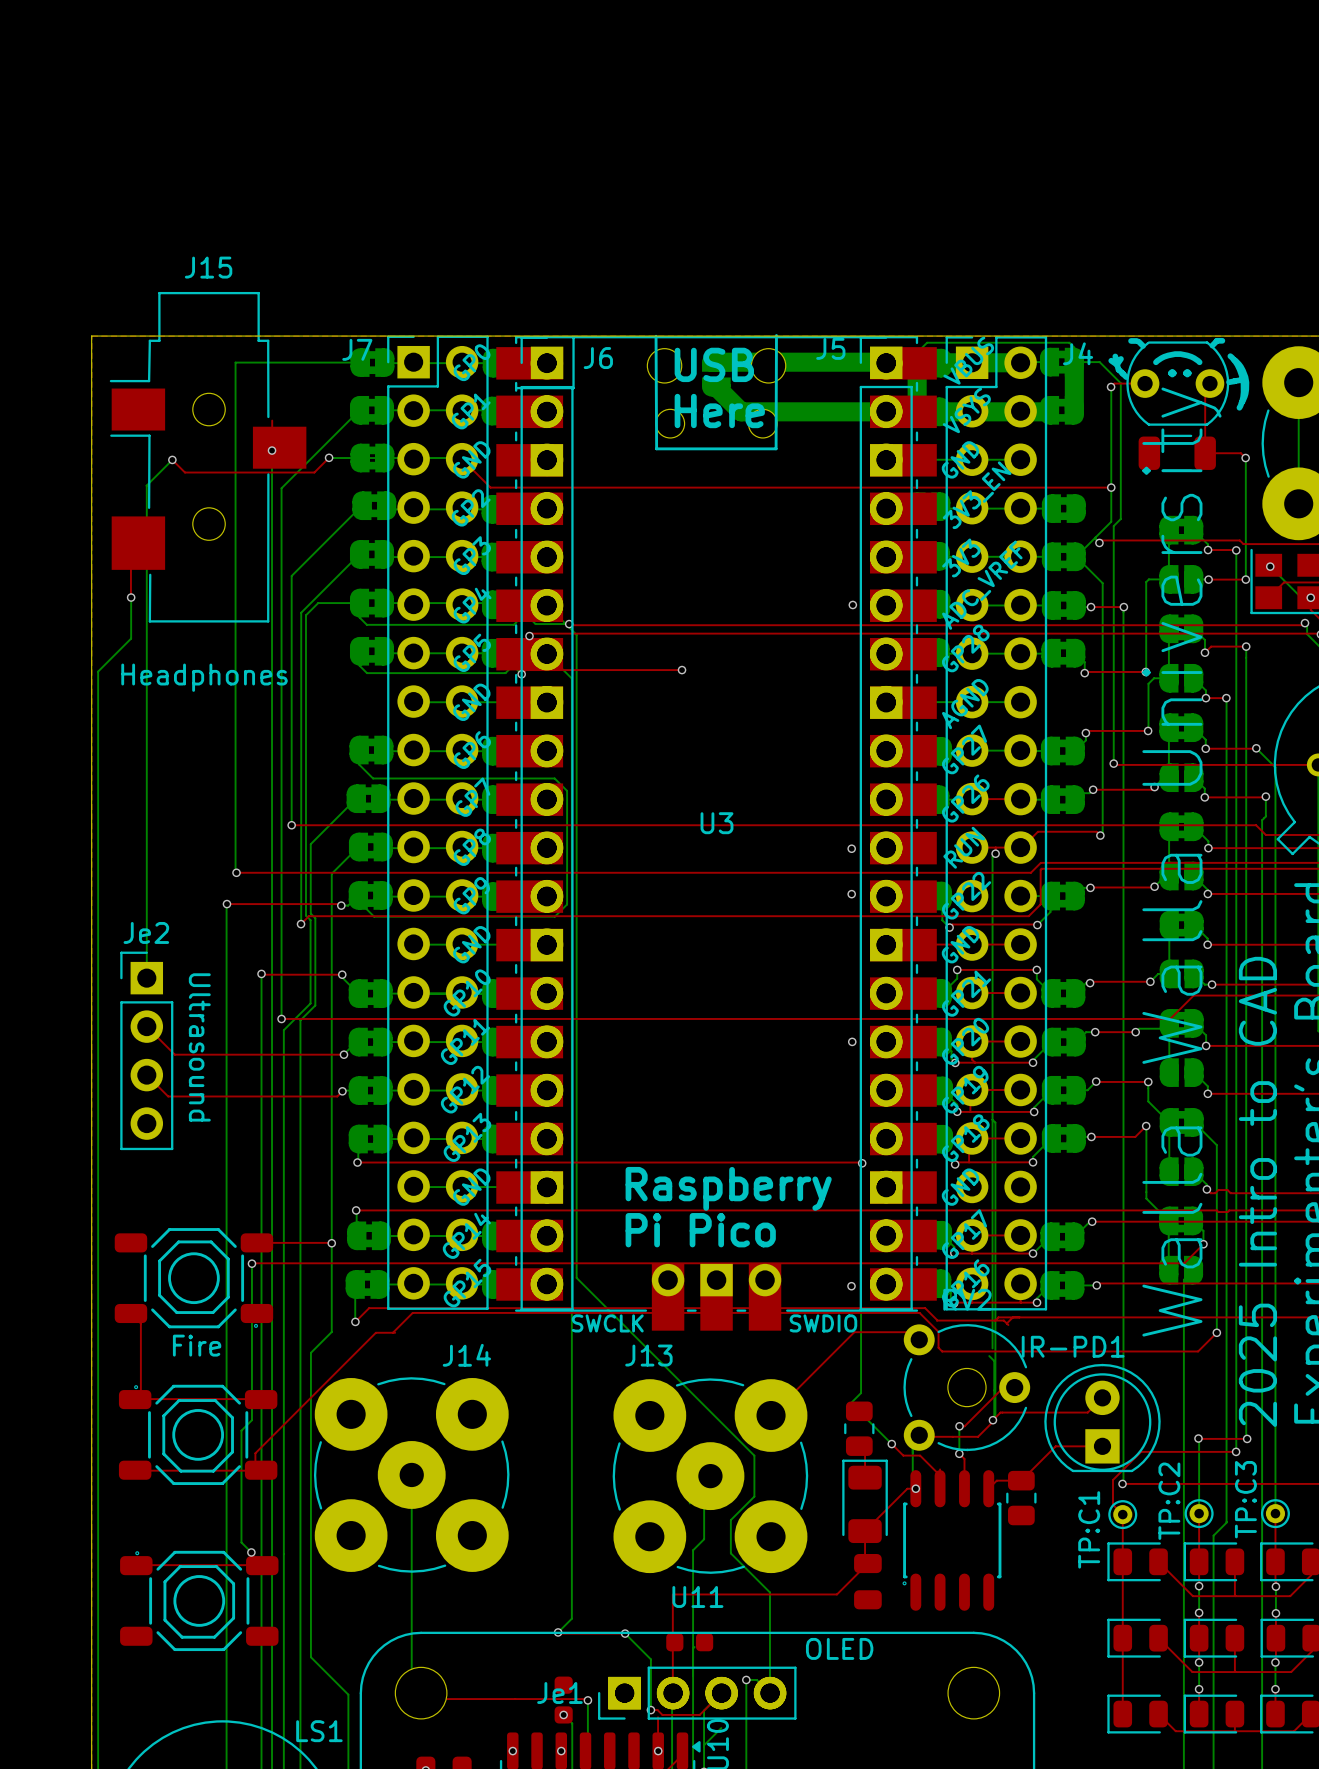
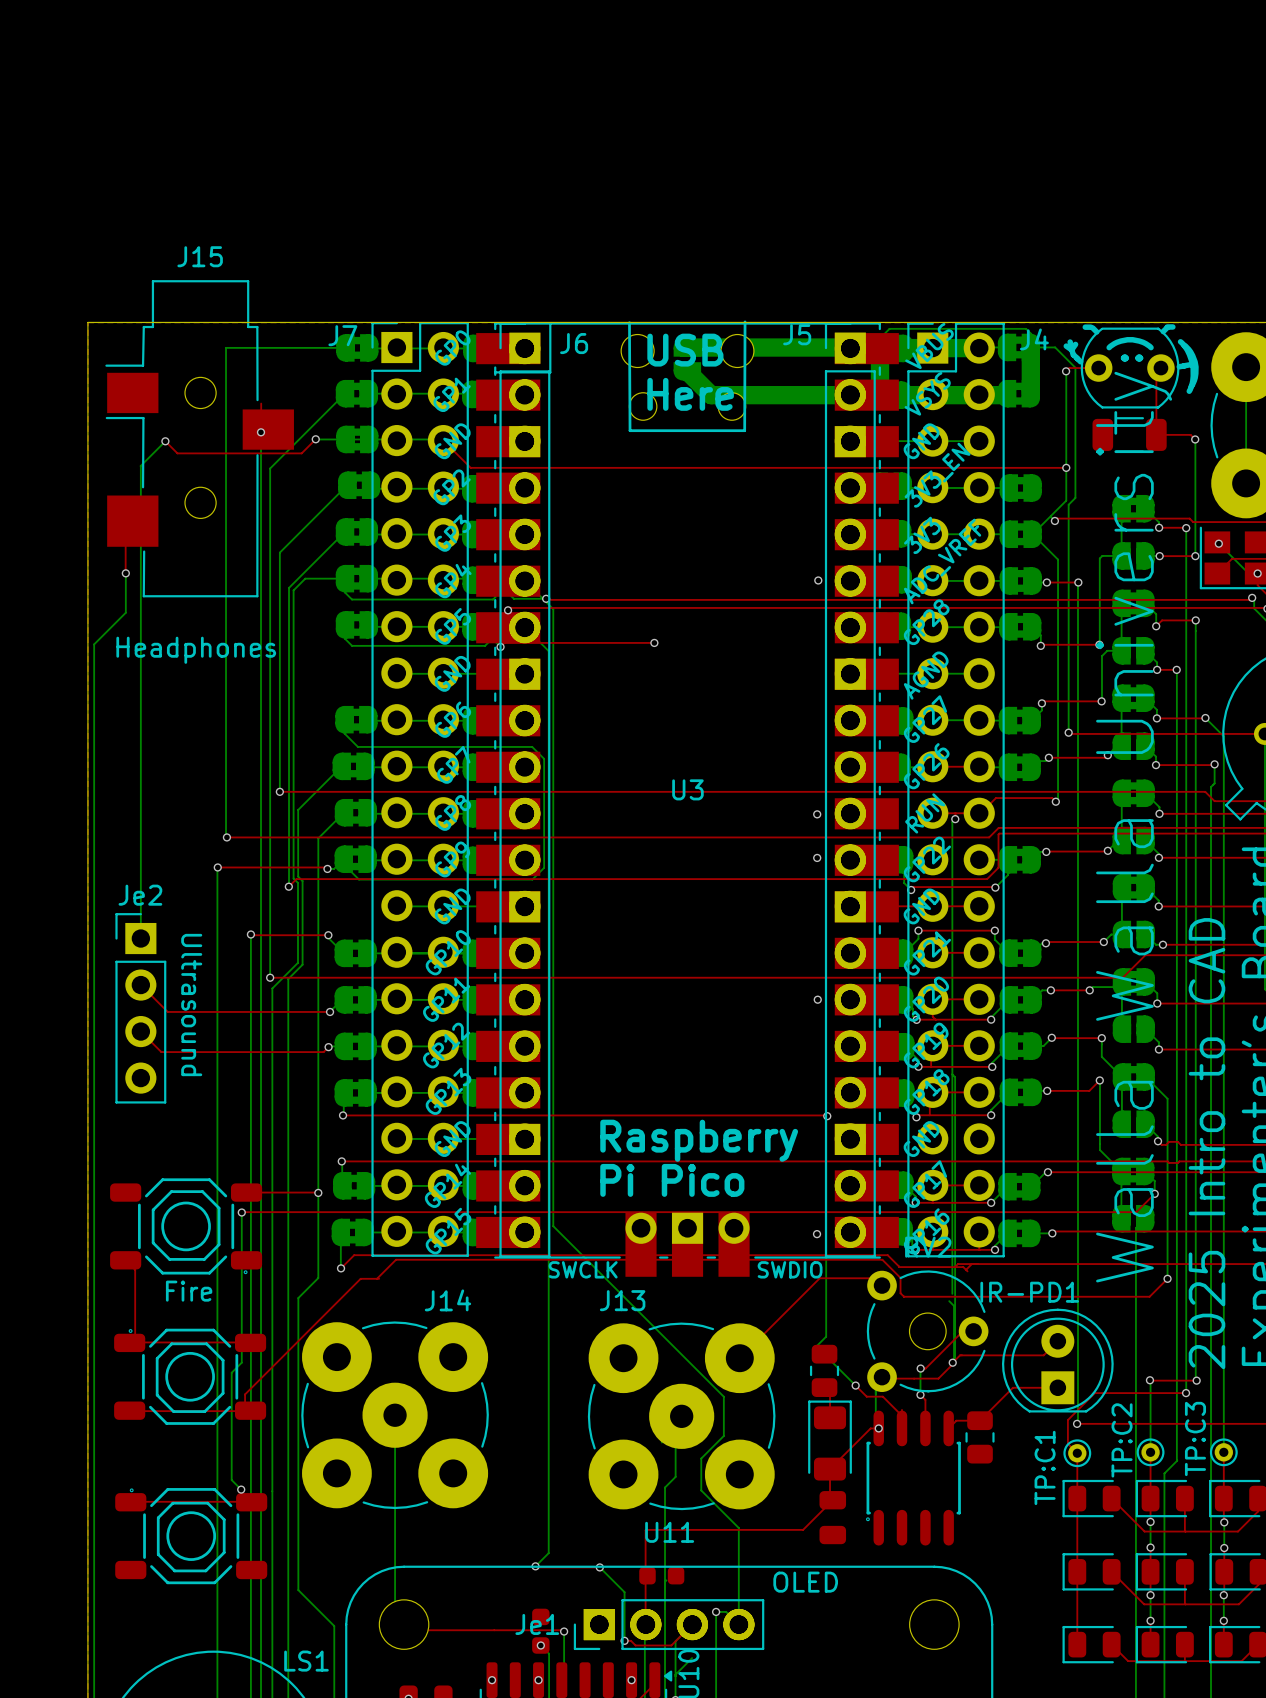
top track: (658, 1717) (658, 1750) -> none

